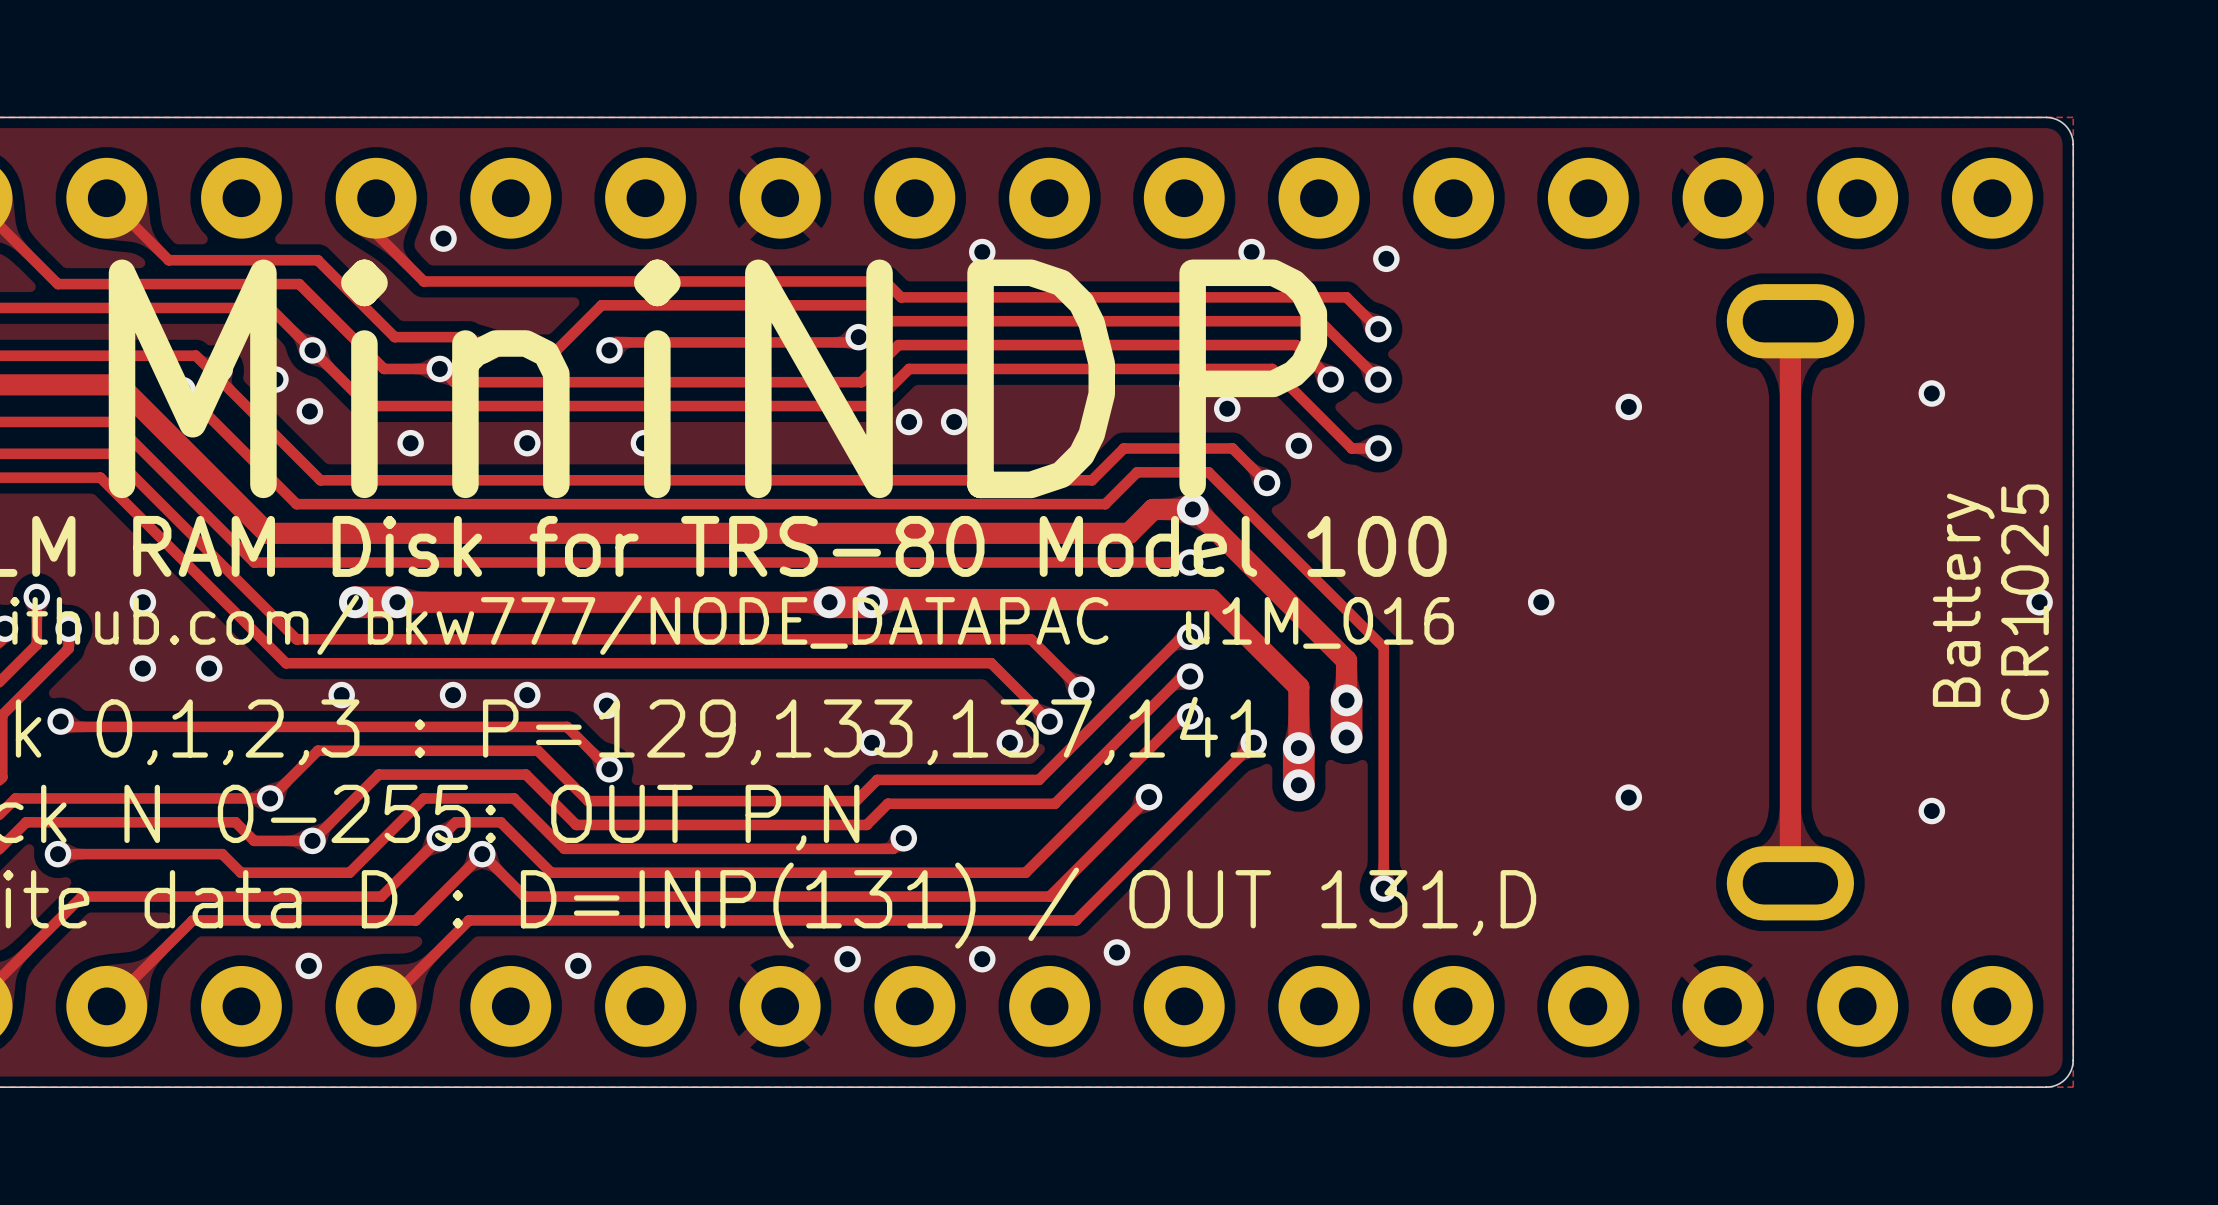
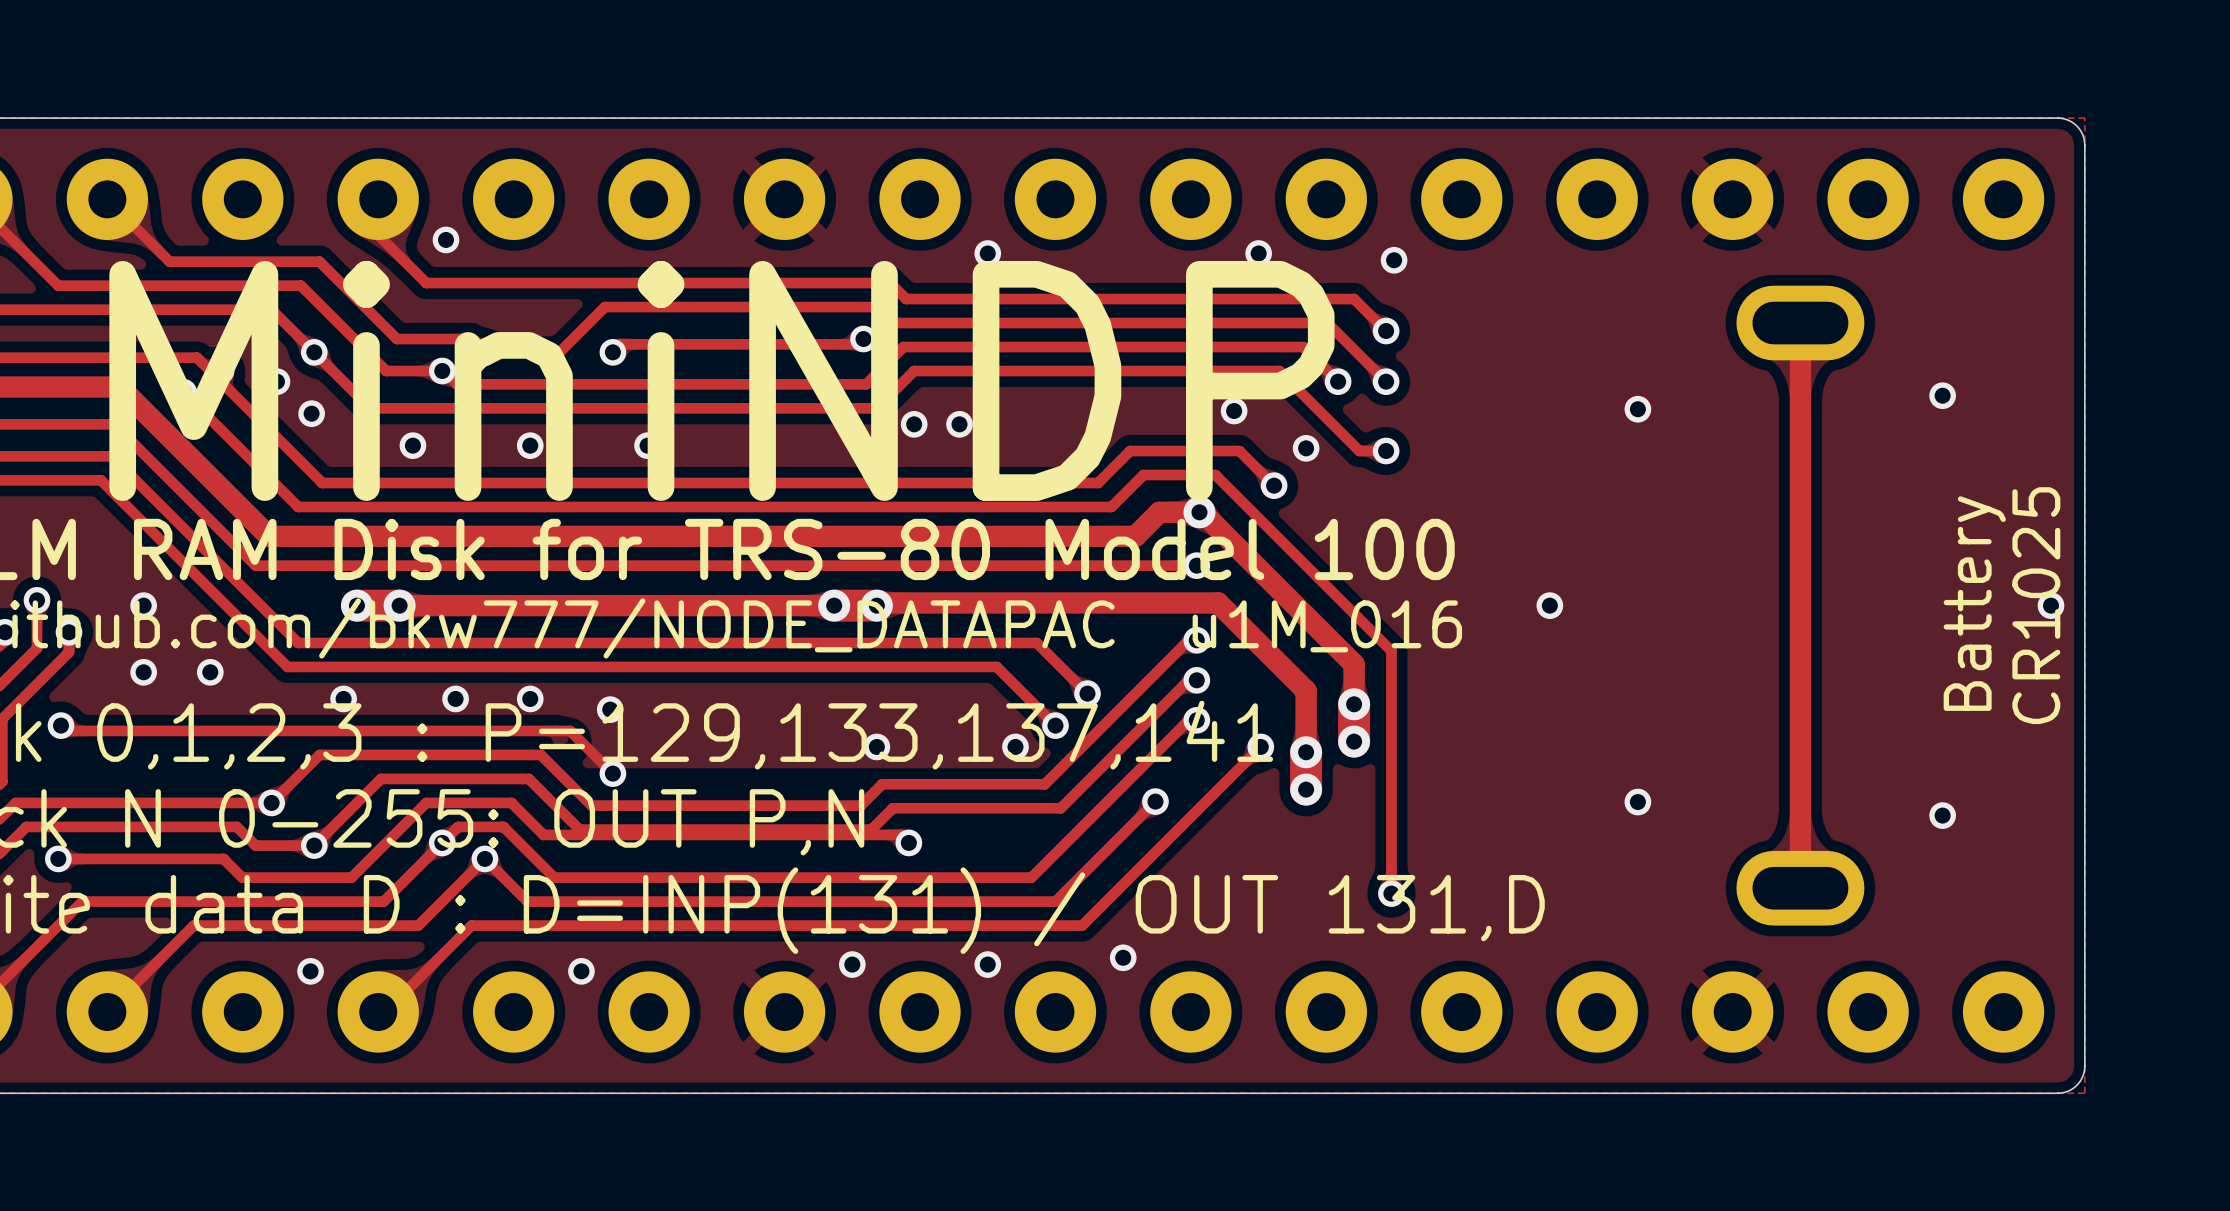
track: (508, 798) (514, 798) (564, 848) (893, 848) (903, 838) -> (511, 802) (543, 834) (900, 834) (908, 842)

